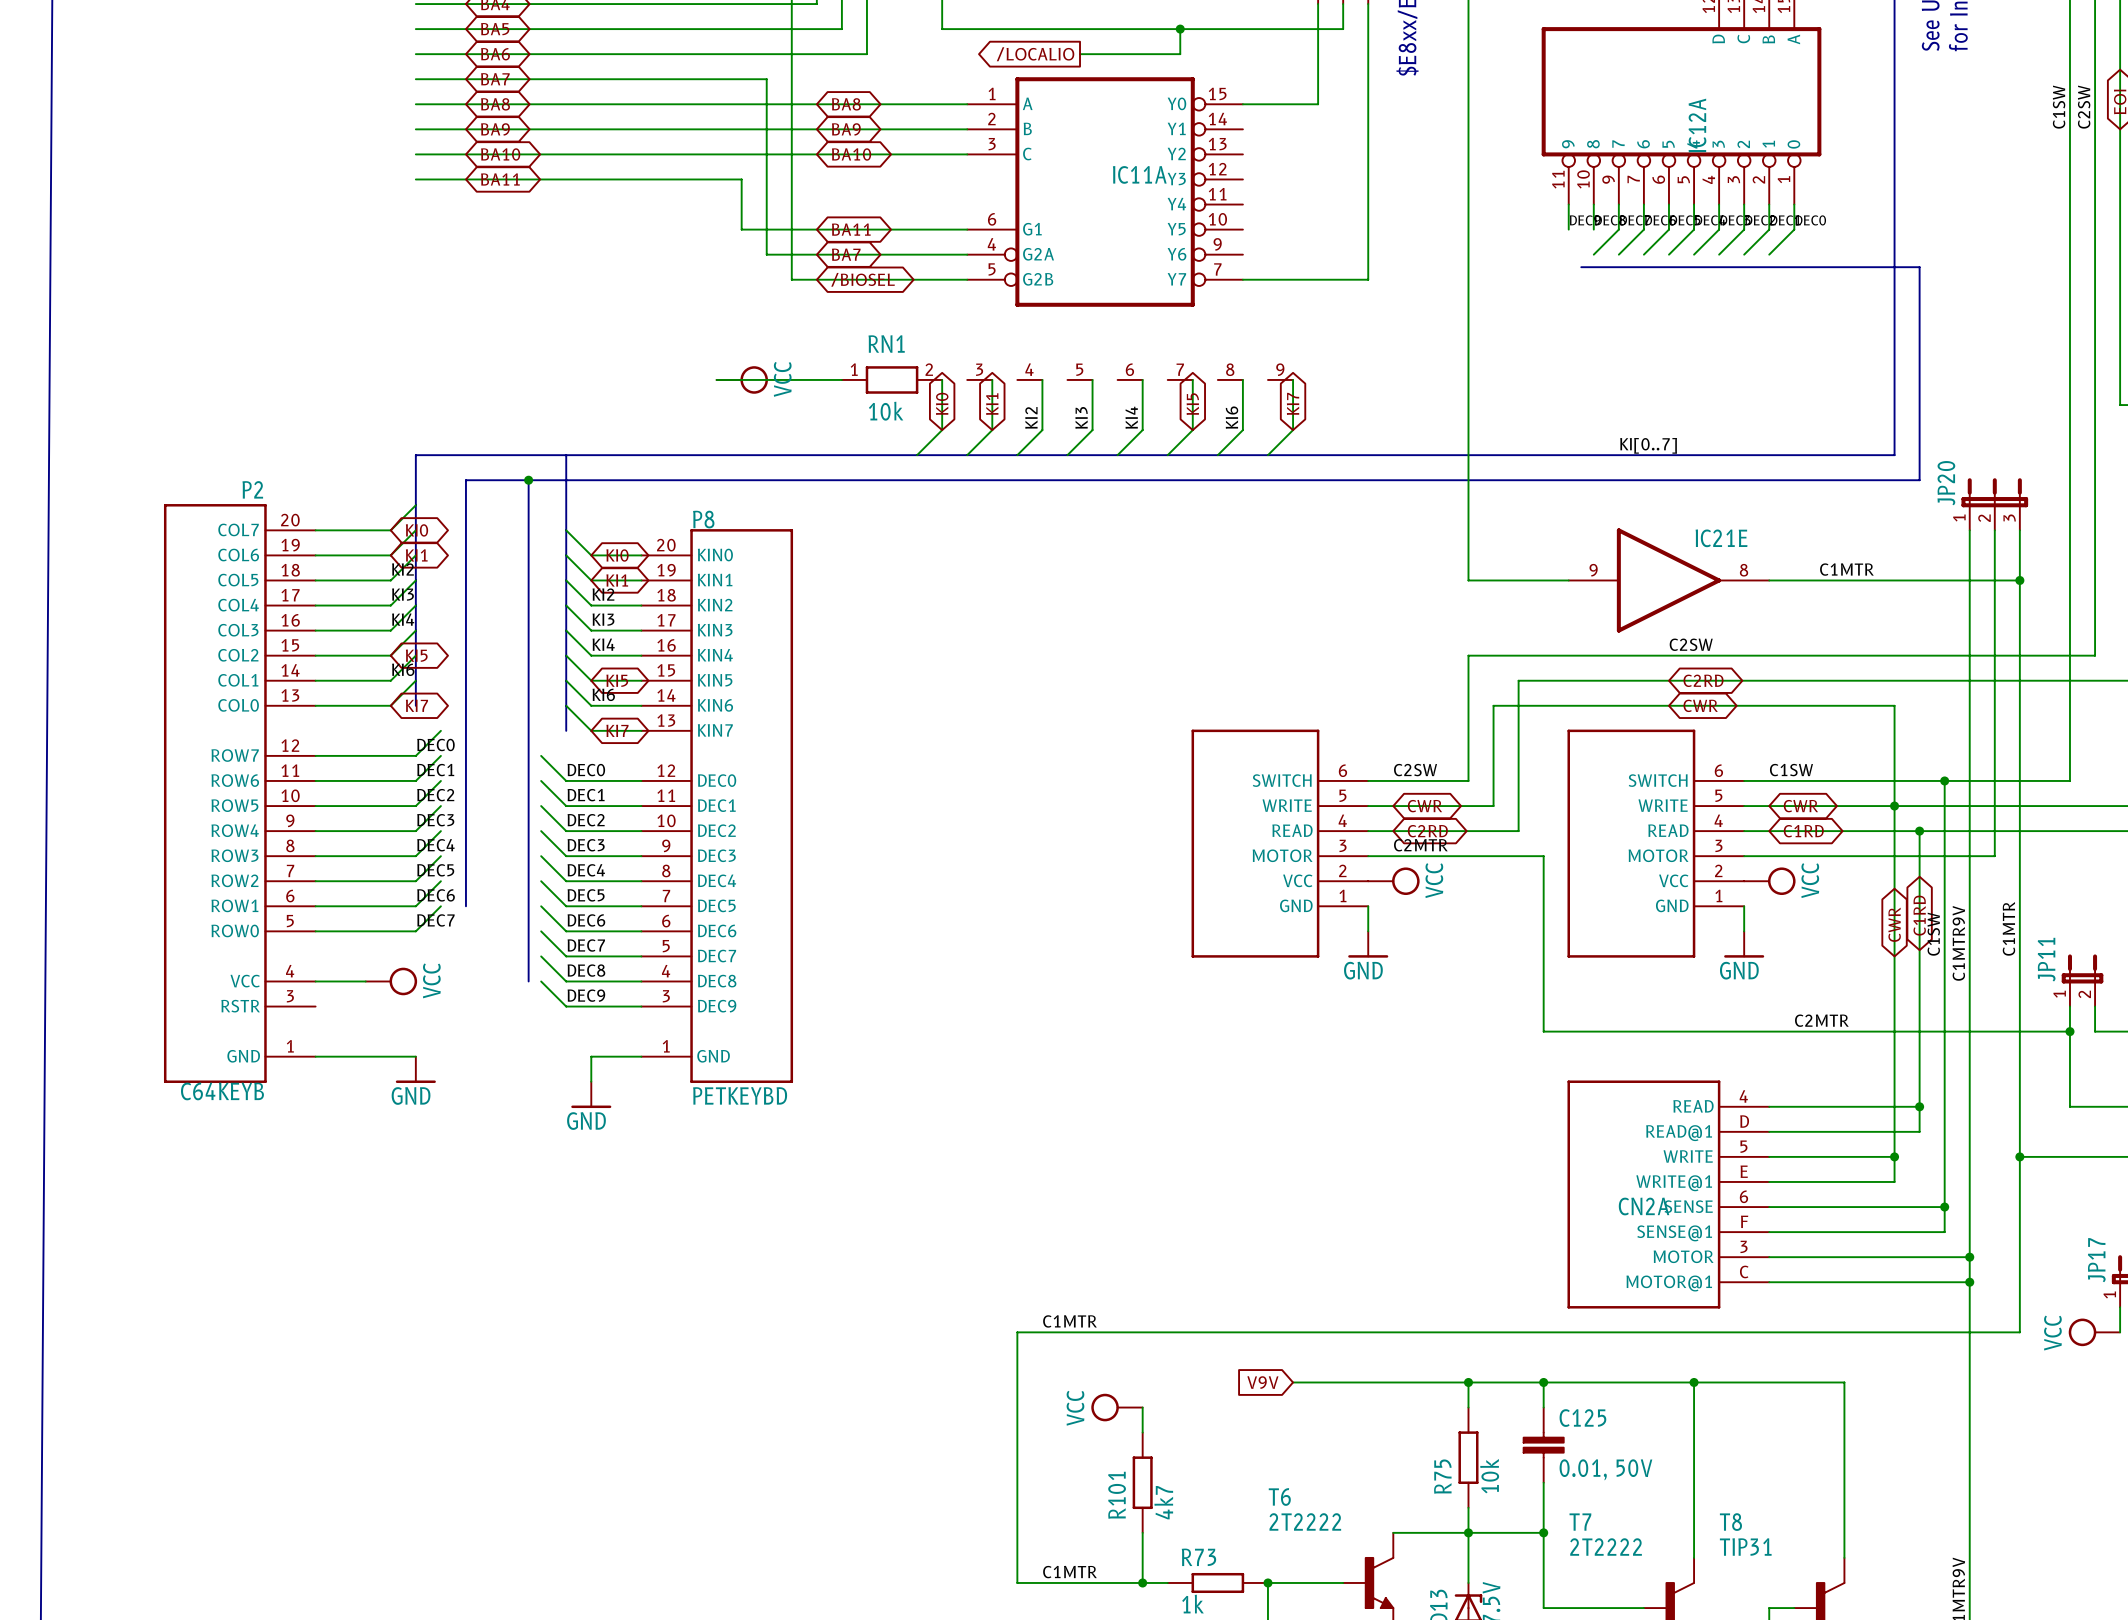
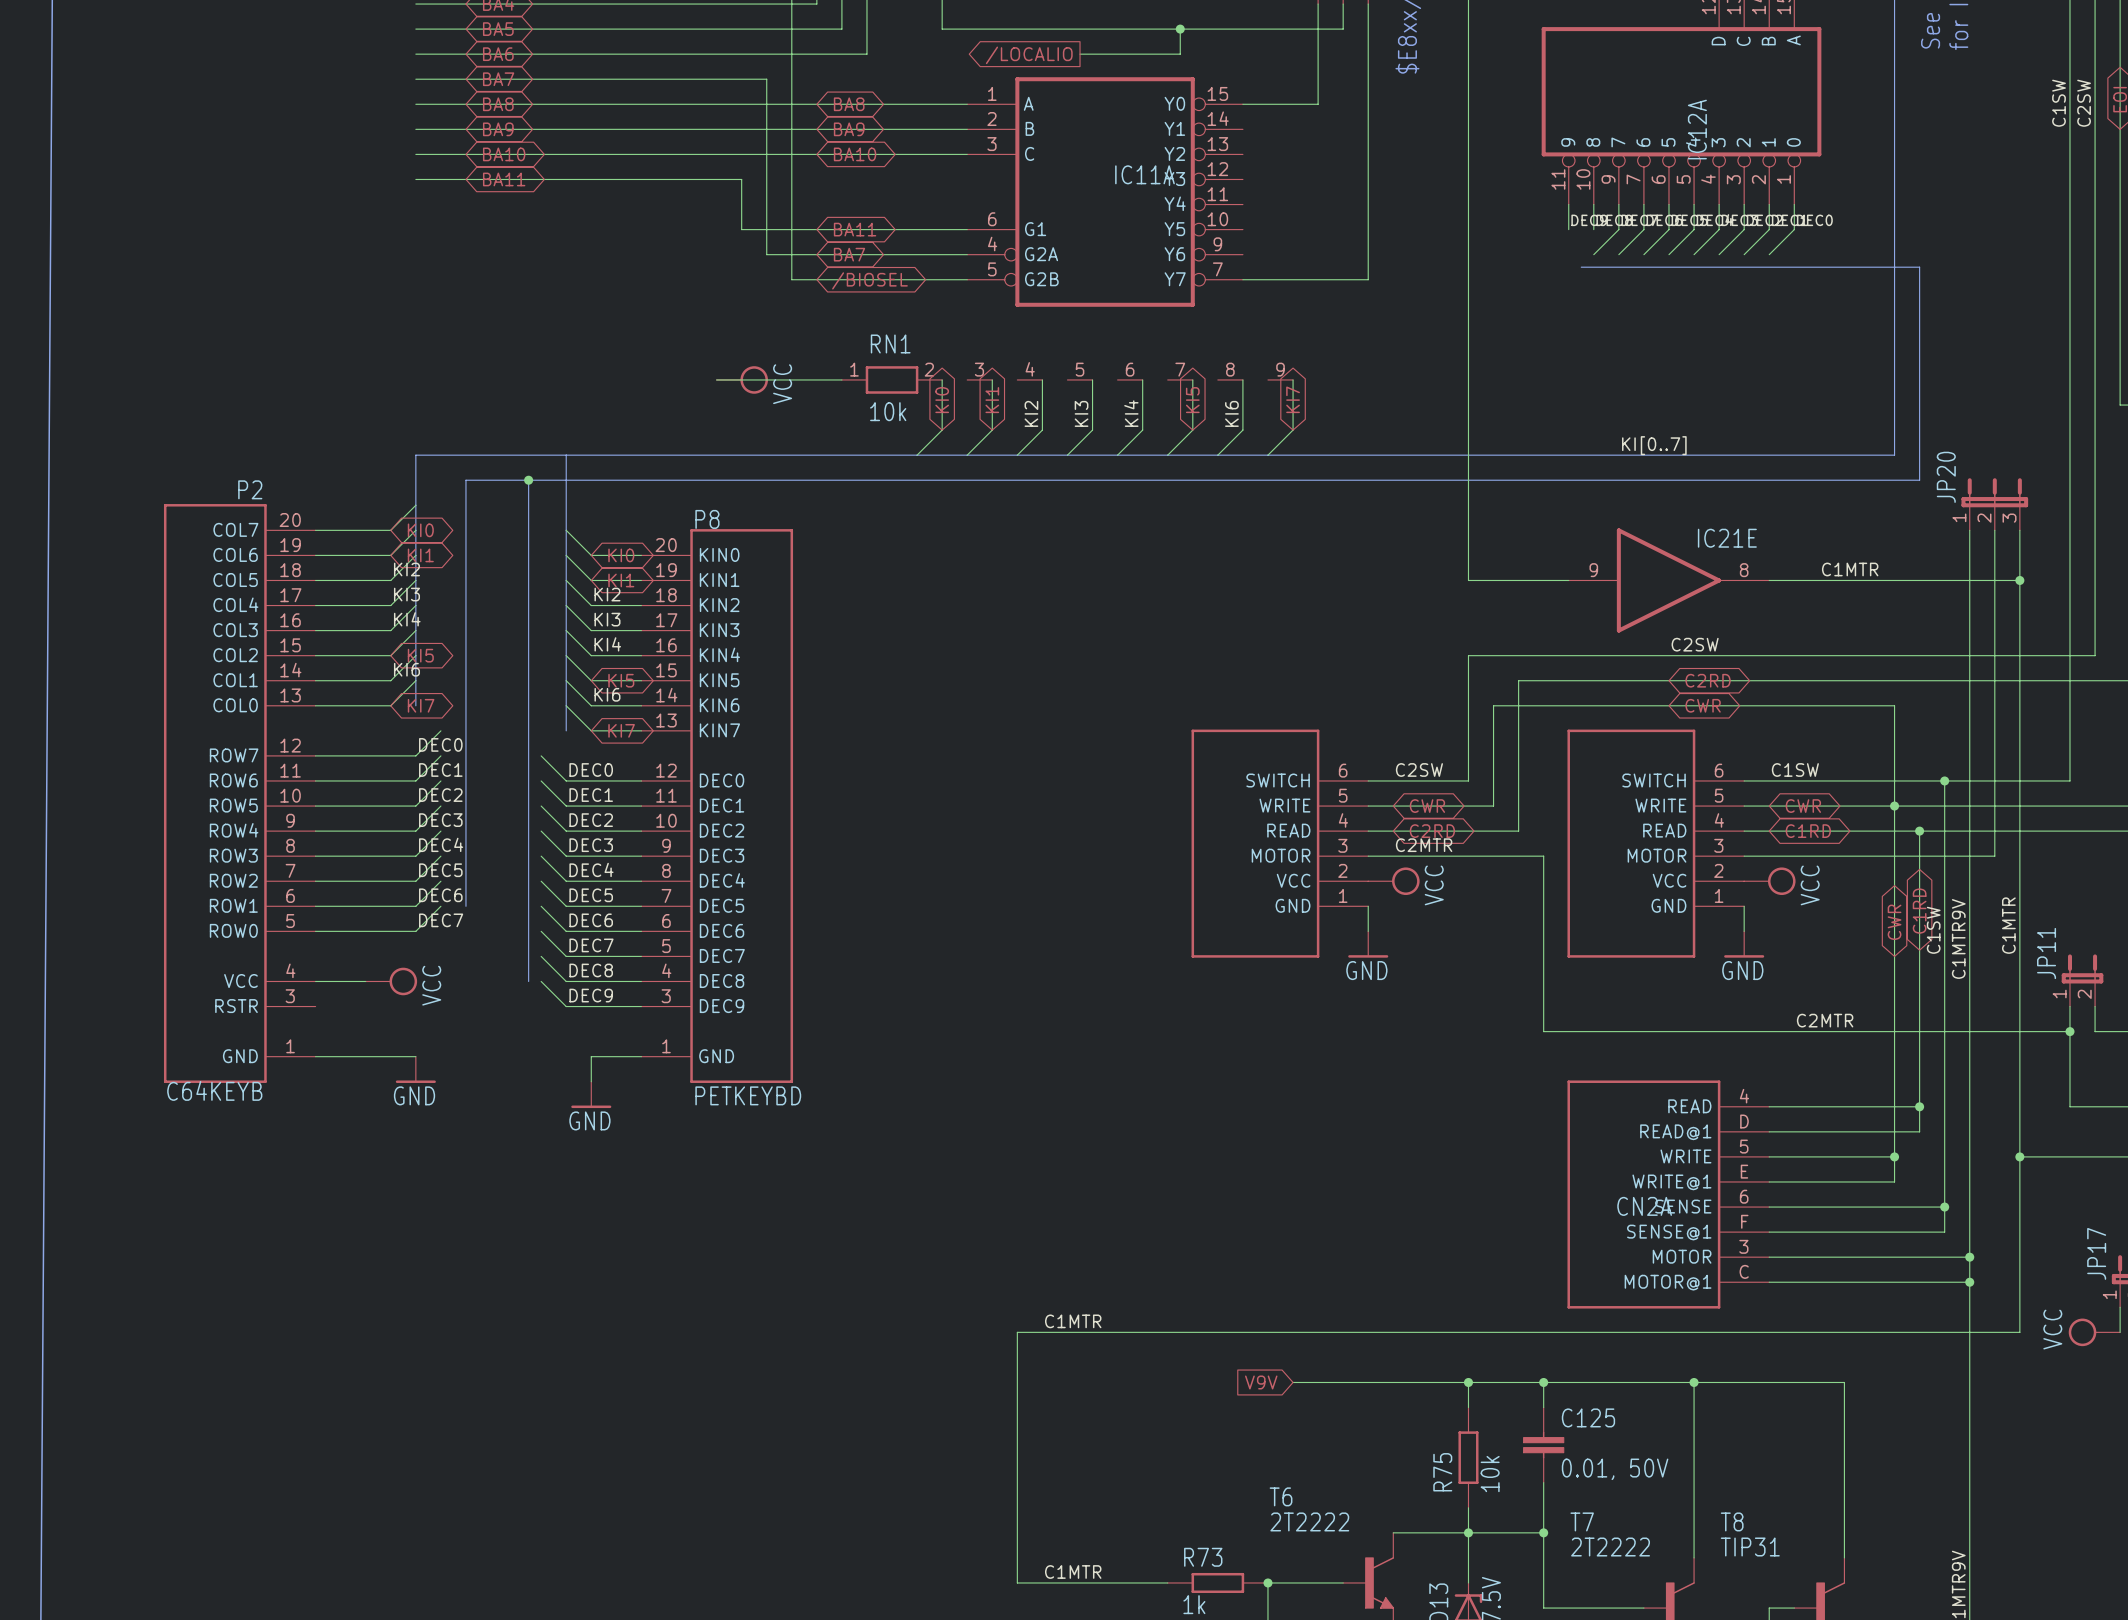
power symbol: VCC (1116, 1407) -> none
wire: (1142, 1407) (1142, 1432) -> none
R101: 4k7 (1142, 1482) -> none
wire: (1142, 1532) (1142, 1582) -> none
junction: (1142, 1582) -> none

